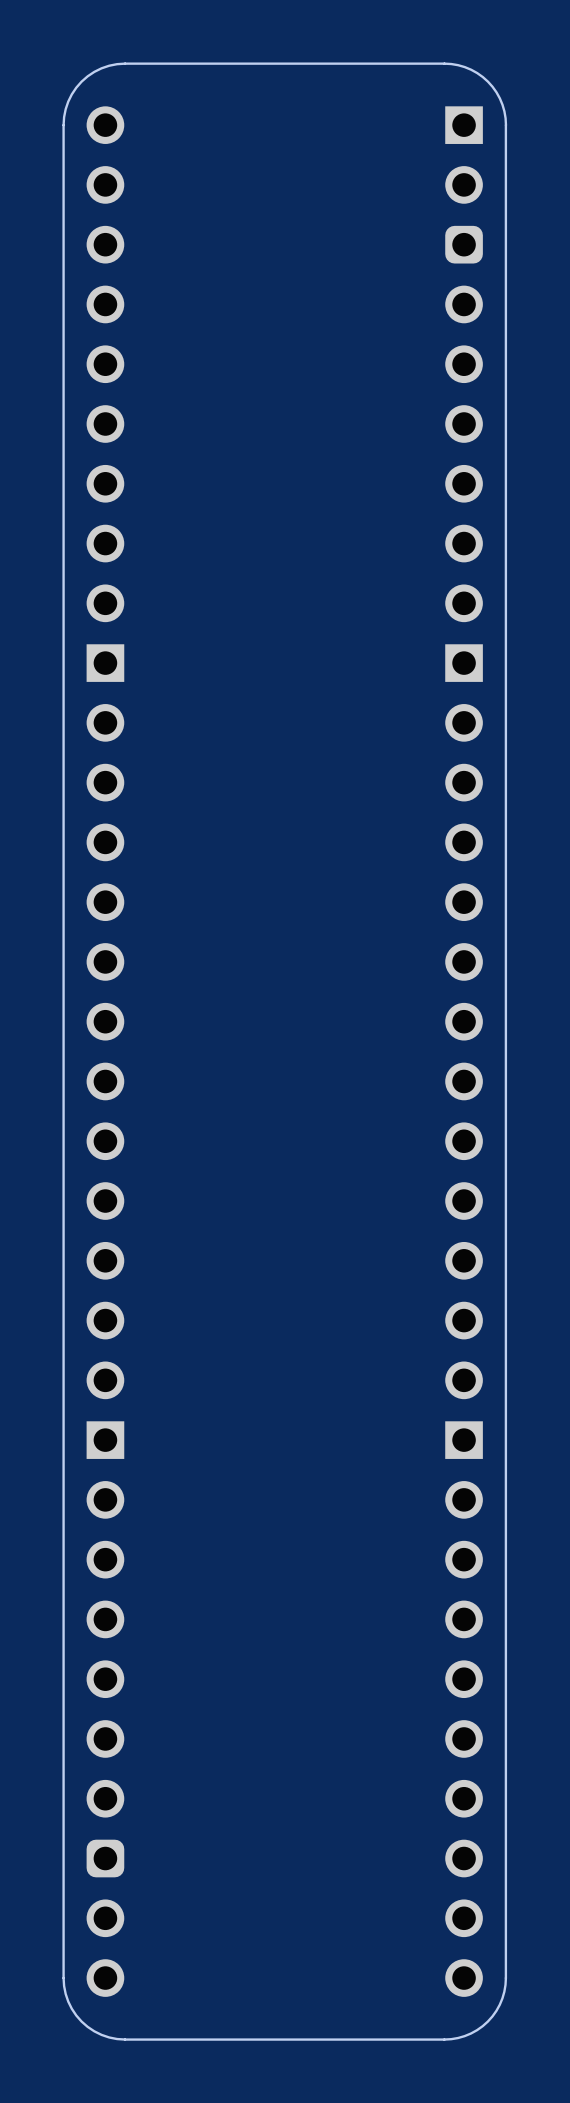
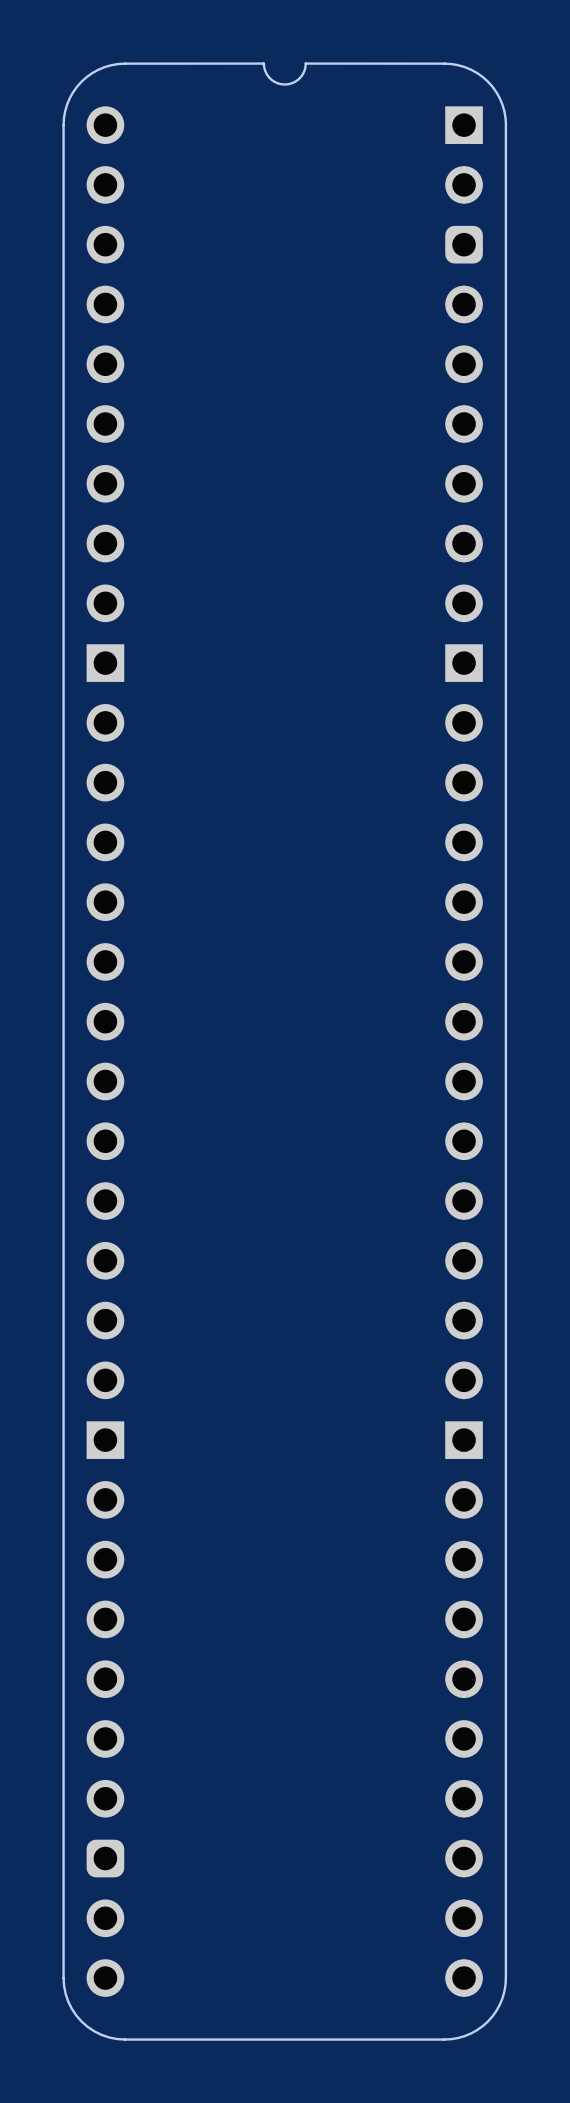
part footprint: [62, 62, 508, 2041] -> [62, 62, 508, 2041]

